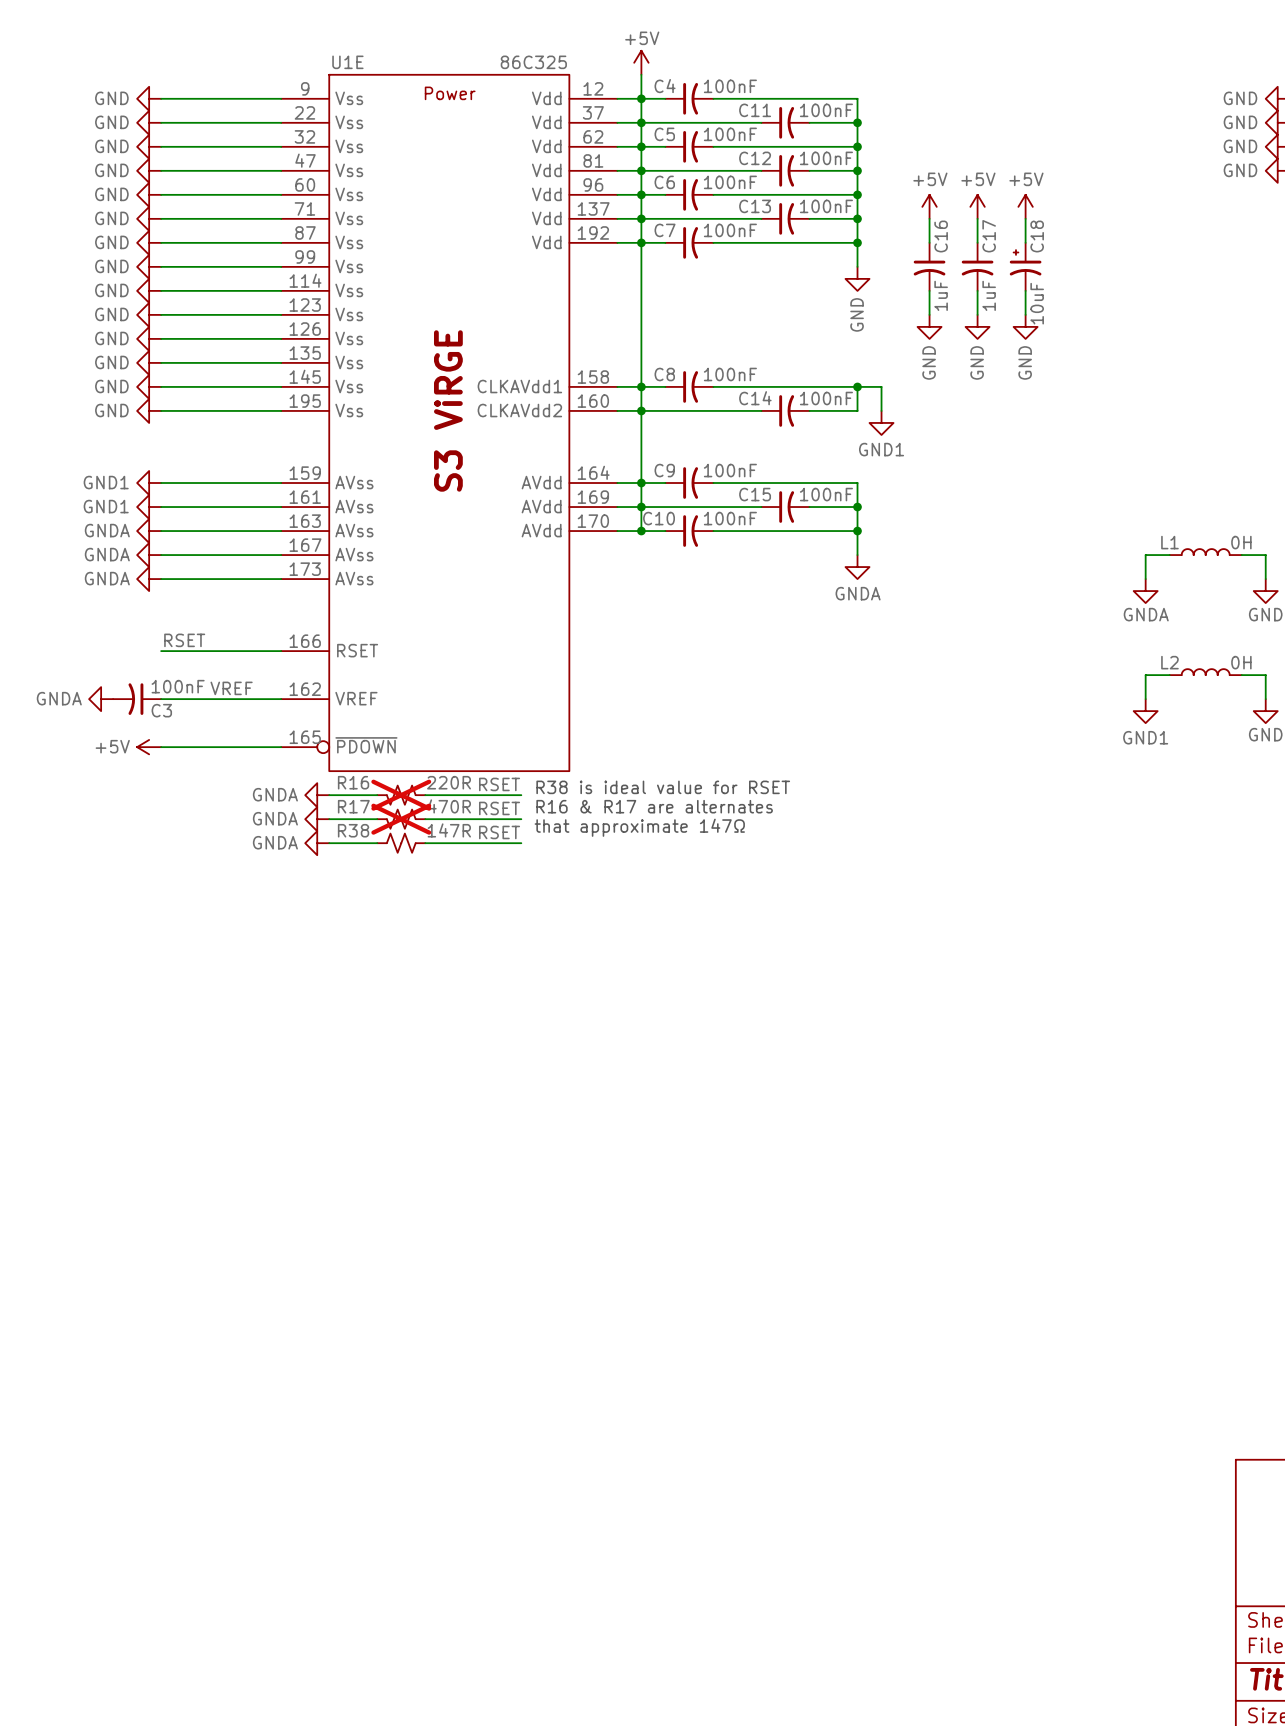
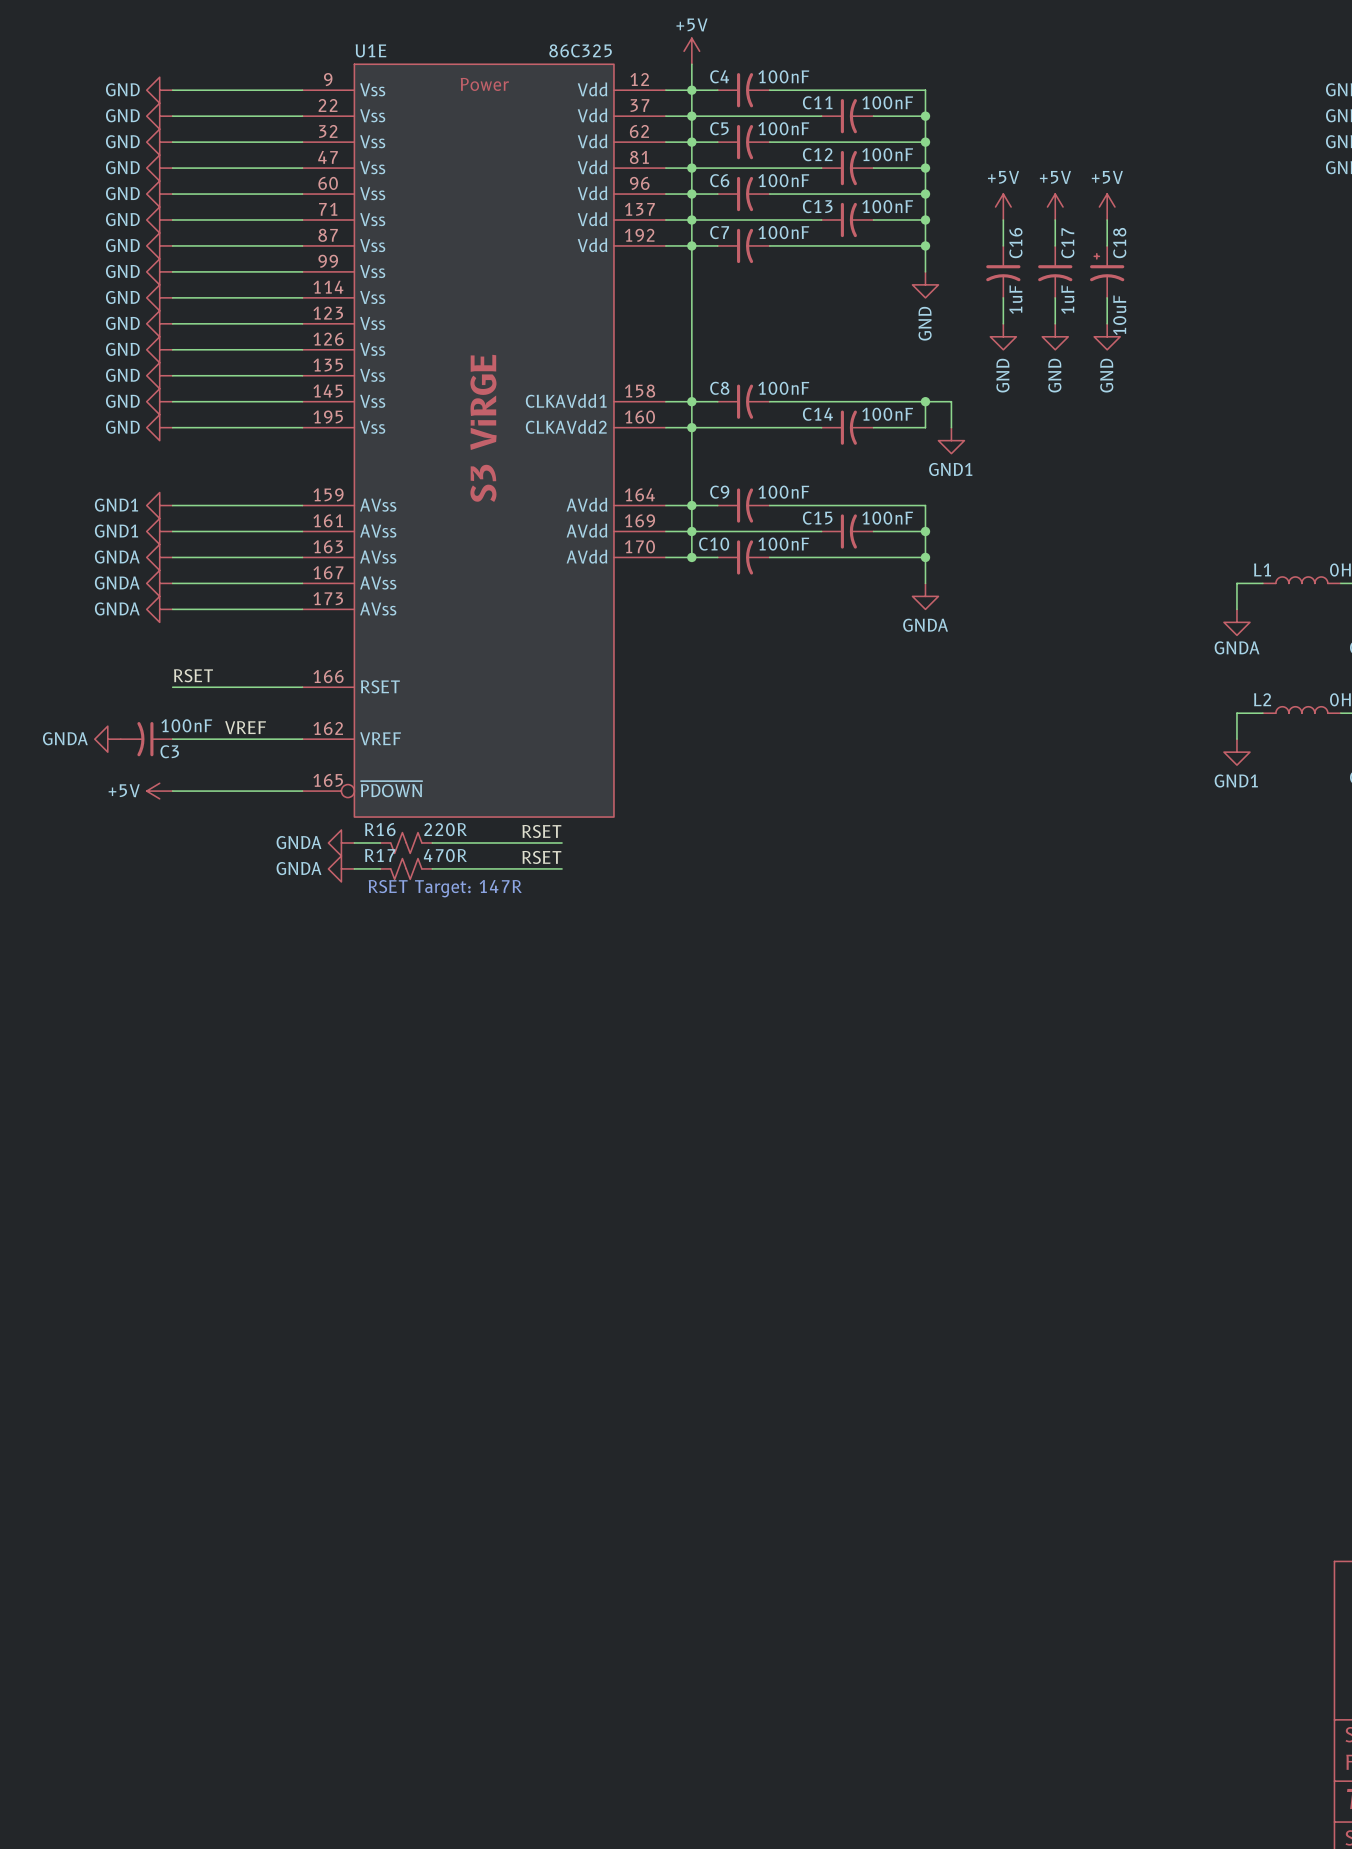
R16 value position: 220R (449, 782) -> 220R (445, 829)
text: R38 is ideal value for RSET (663, 787) -> none
R16 position: (401, 795) -> (406, 842)
R16 do-not-place cross: (401, 795) -> none
R17 value position: 470R (449, 806) -> 470R (445, 855)
text: R16 & R17 are alternates (654, 806) -> none
R17 position: (401, 819) -> (406, 868)
R17 do-not-place cross: (401, 819) -> none
text: that approximate 147Ω (639, 827) -> none
label: RSET (499, 832) -> none
text: none -> RSET Target: 147R (445, 888)
power symbol: GNDA (317, 843) -> none
wire: (329, 843) (377, 843) -> none
R38: 147R (401, 843) -> none
wire: (425, 843) (521, 843) -> none

